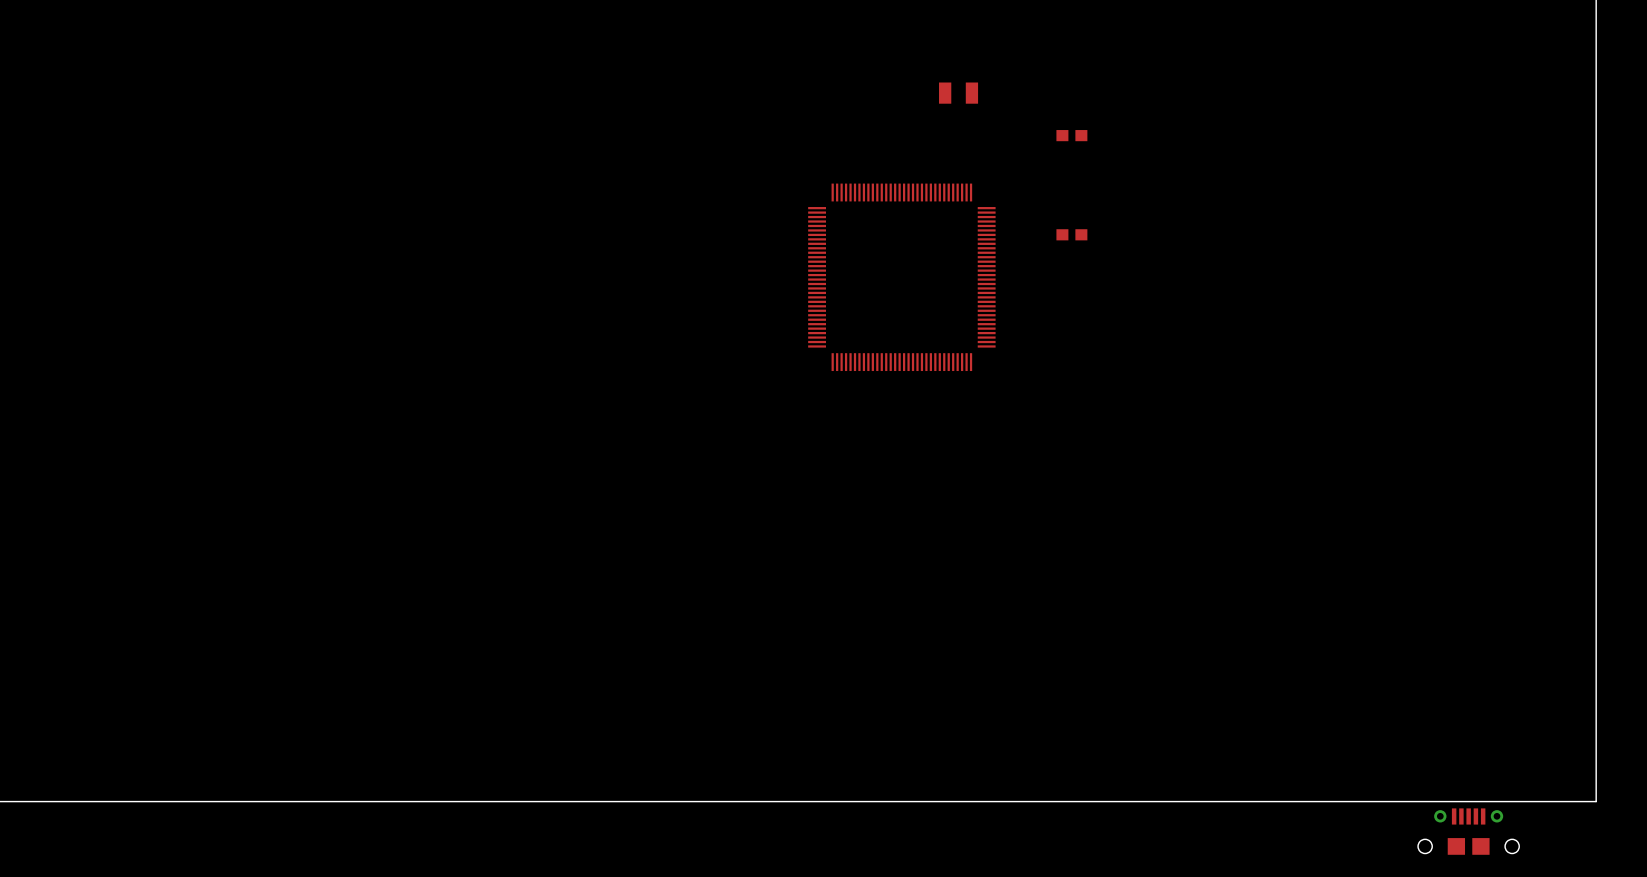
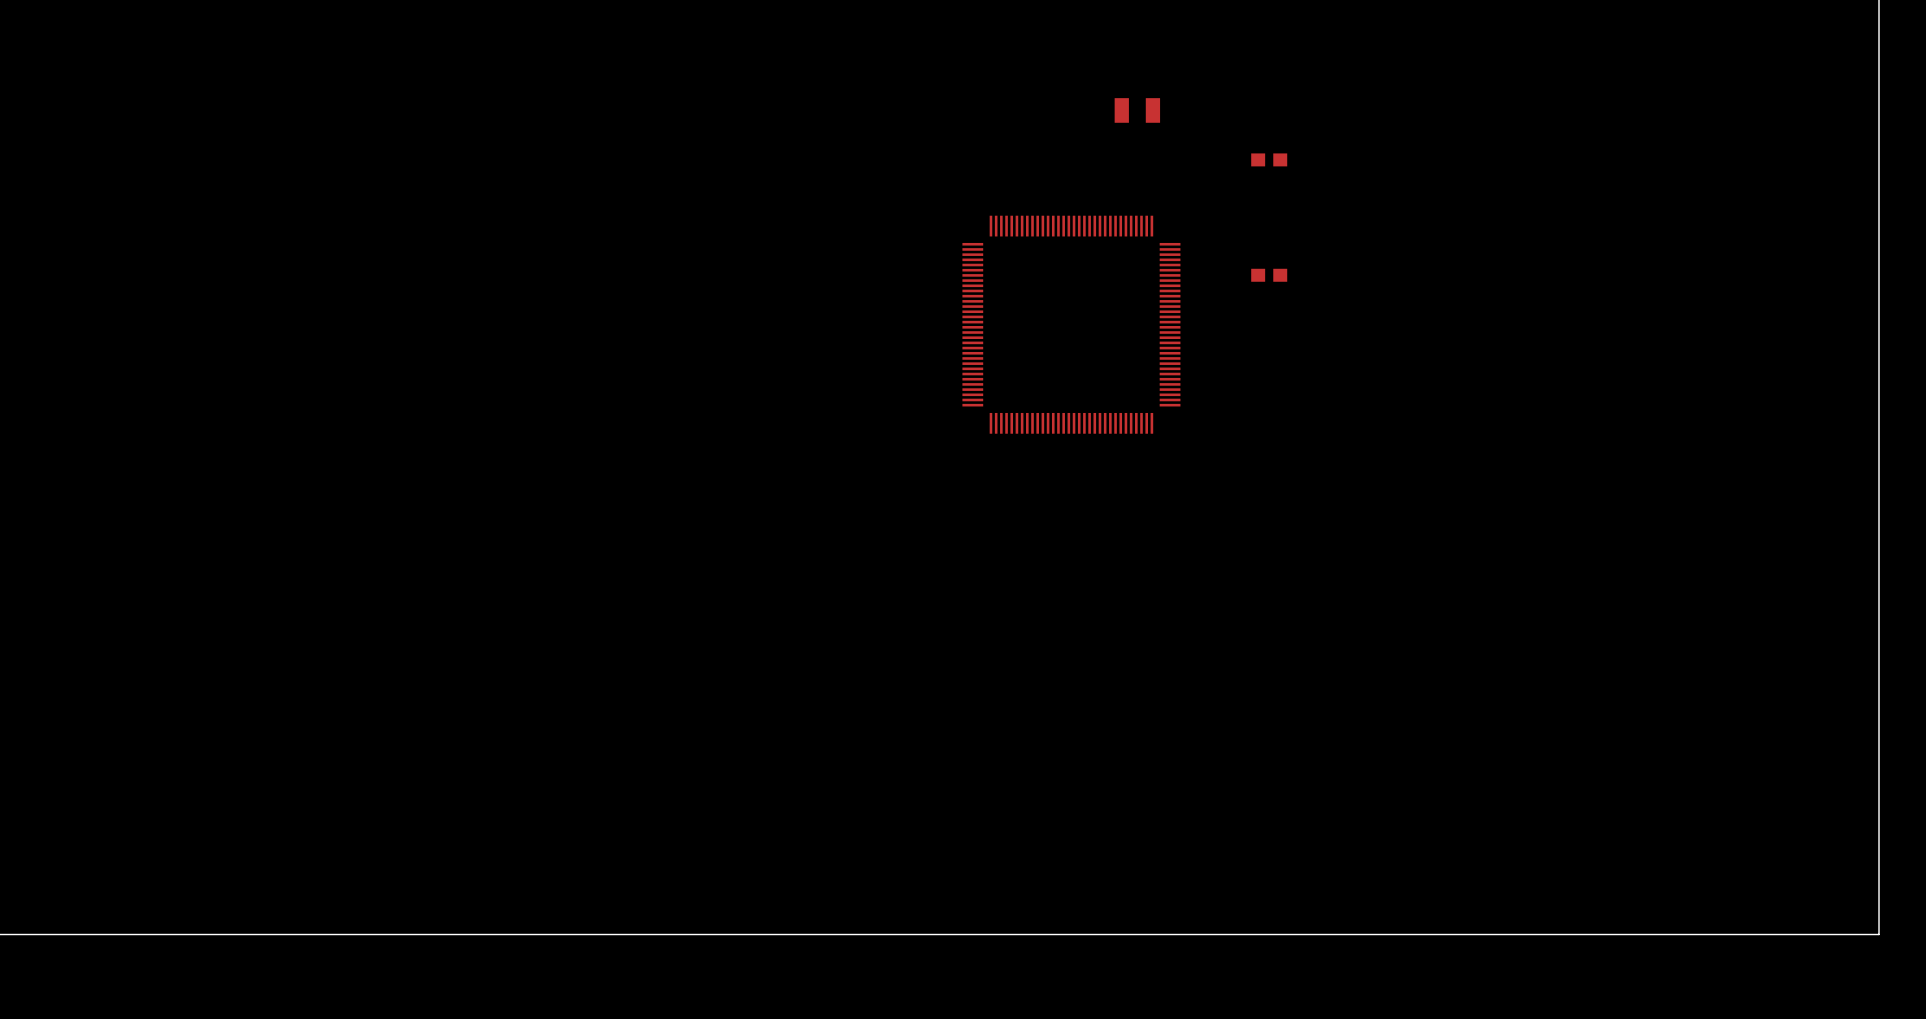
part: (1468, 831) -> none

